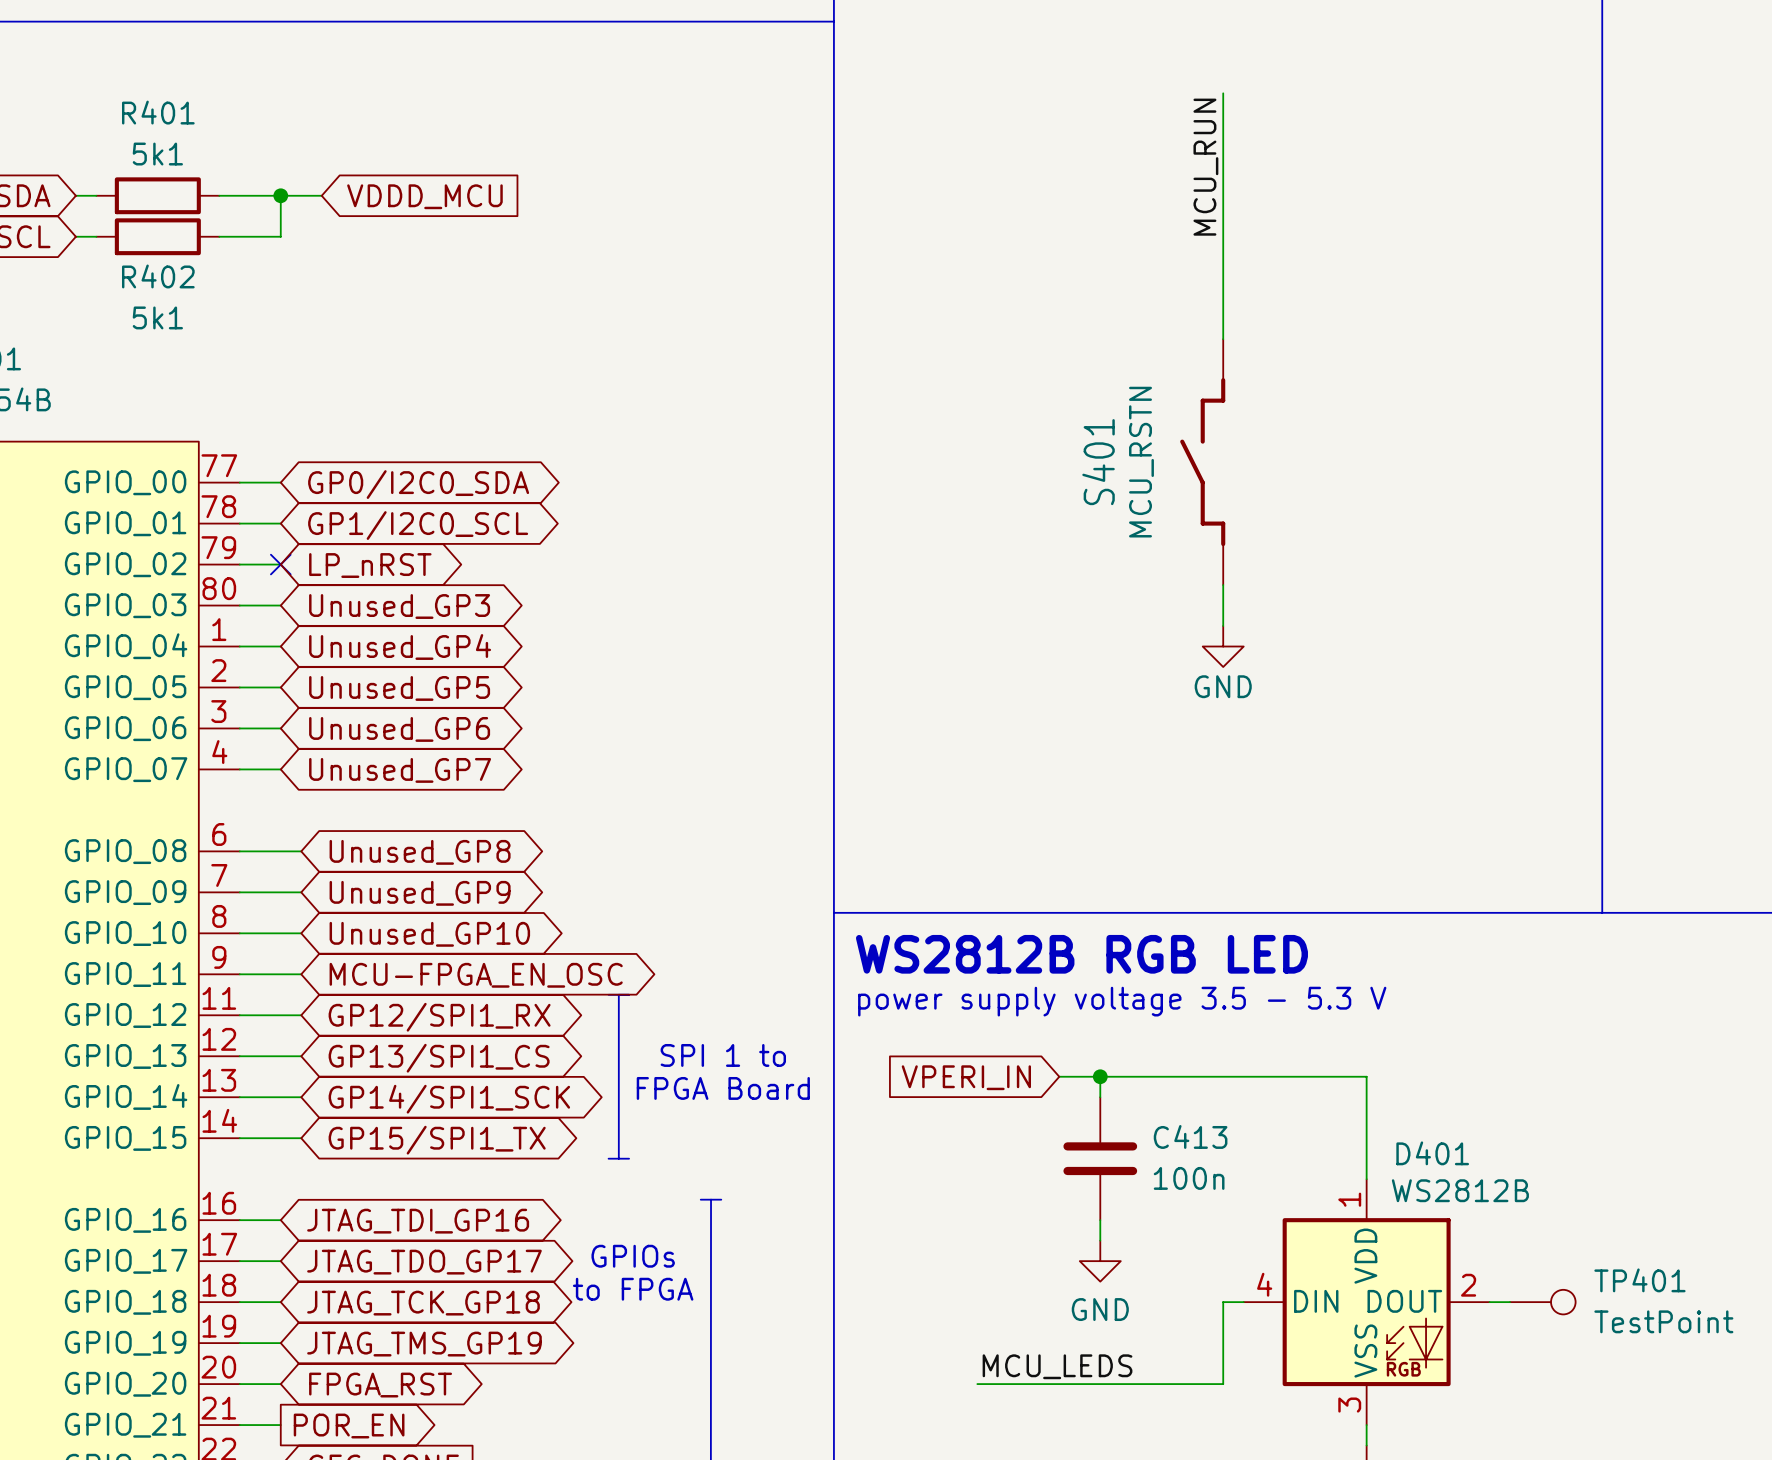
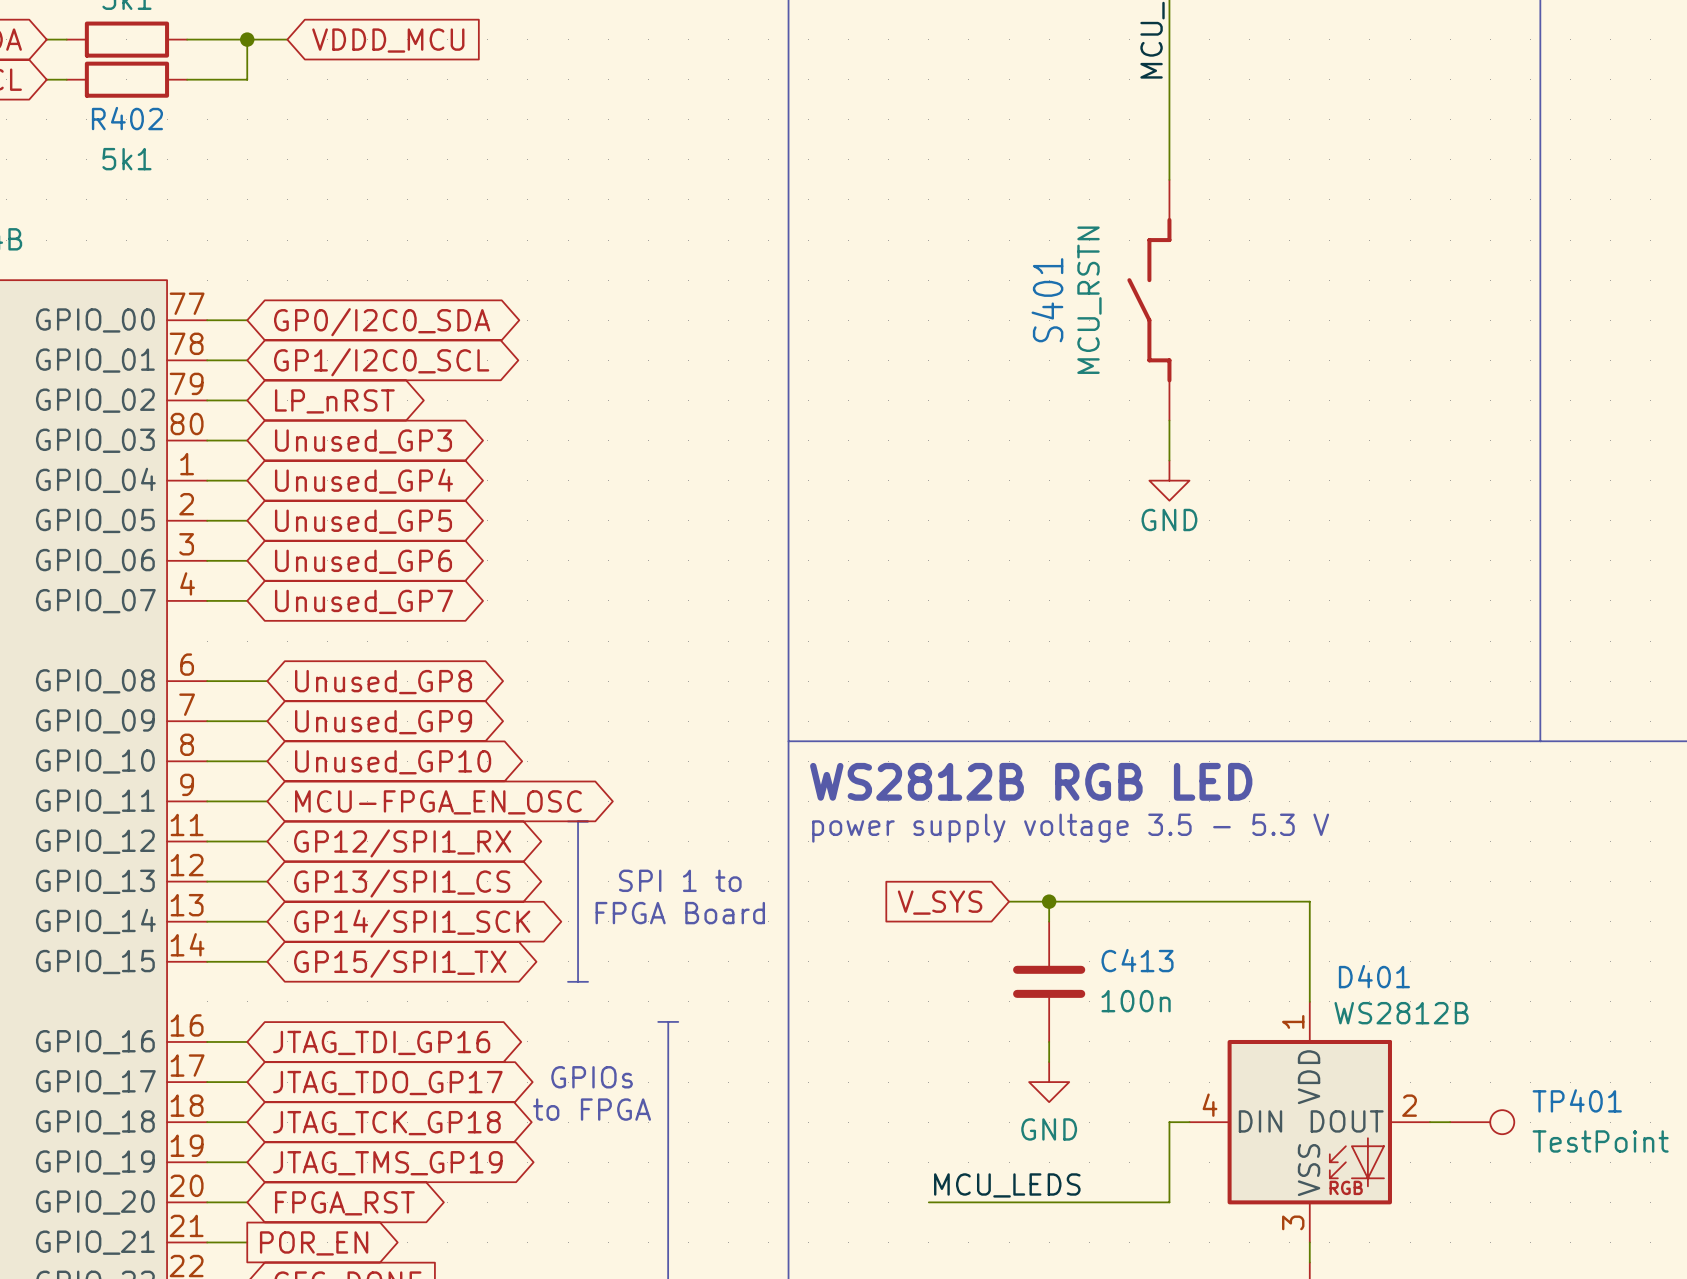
no-connect mark: (280, 564) -> none
global label: VPERI_IN (966, 1077) -> V_SYS (940, 902)

